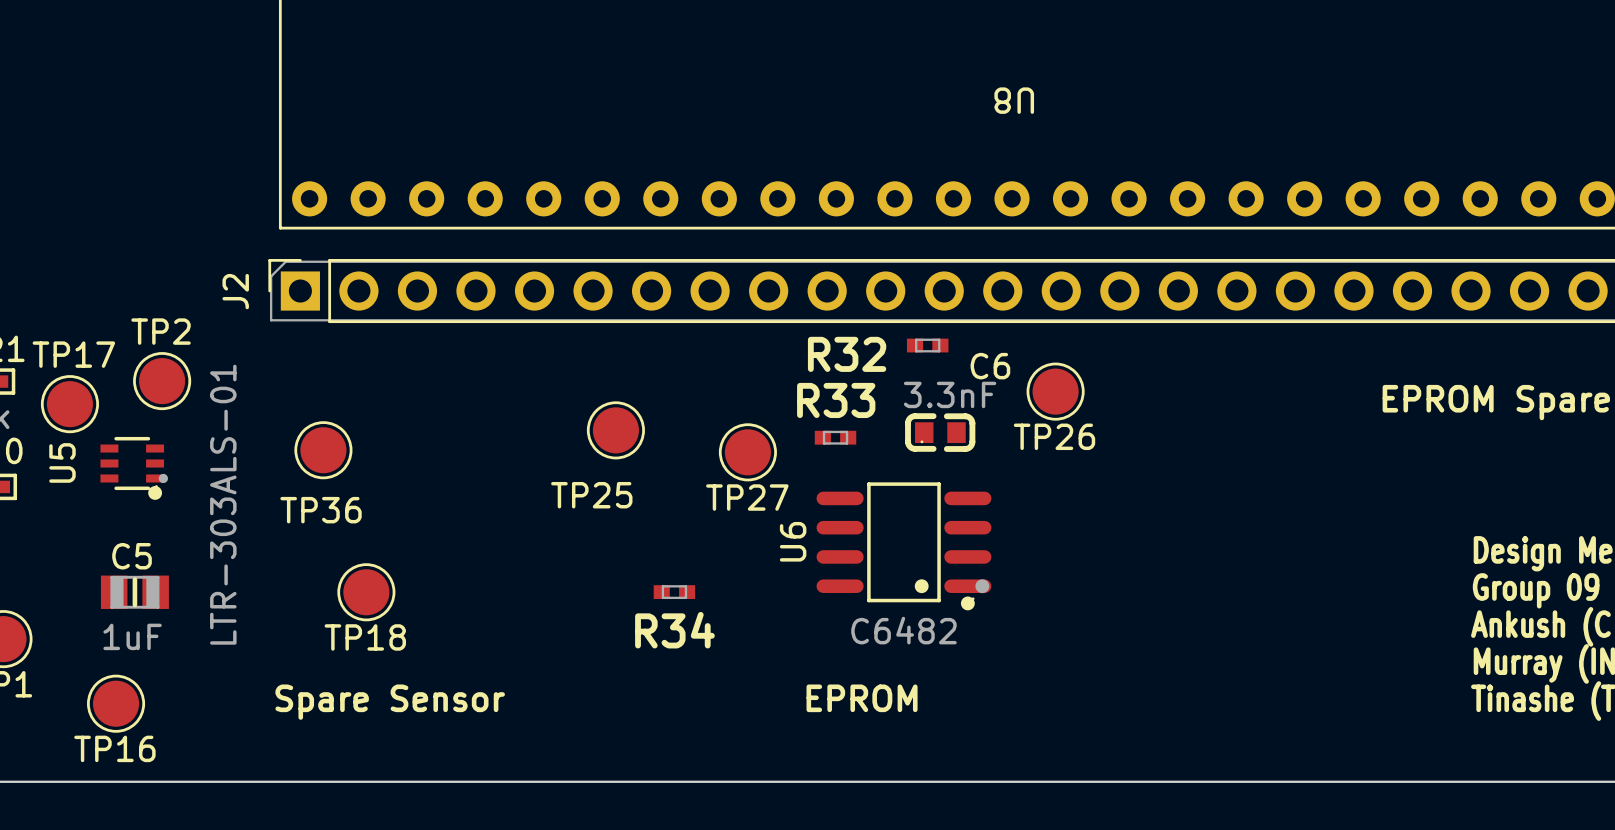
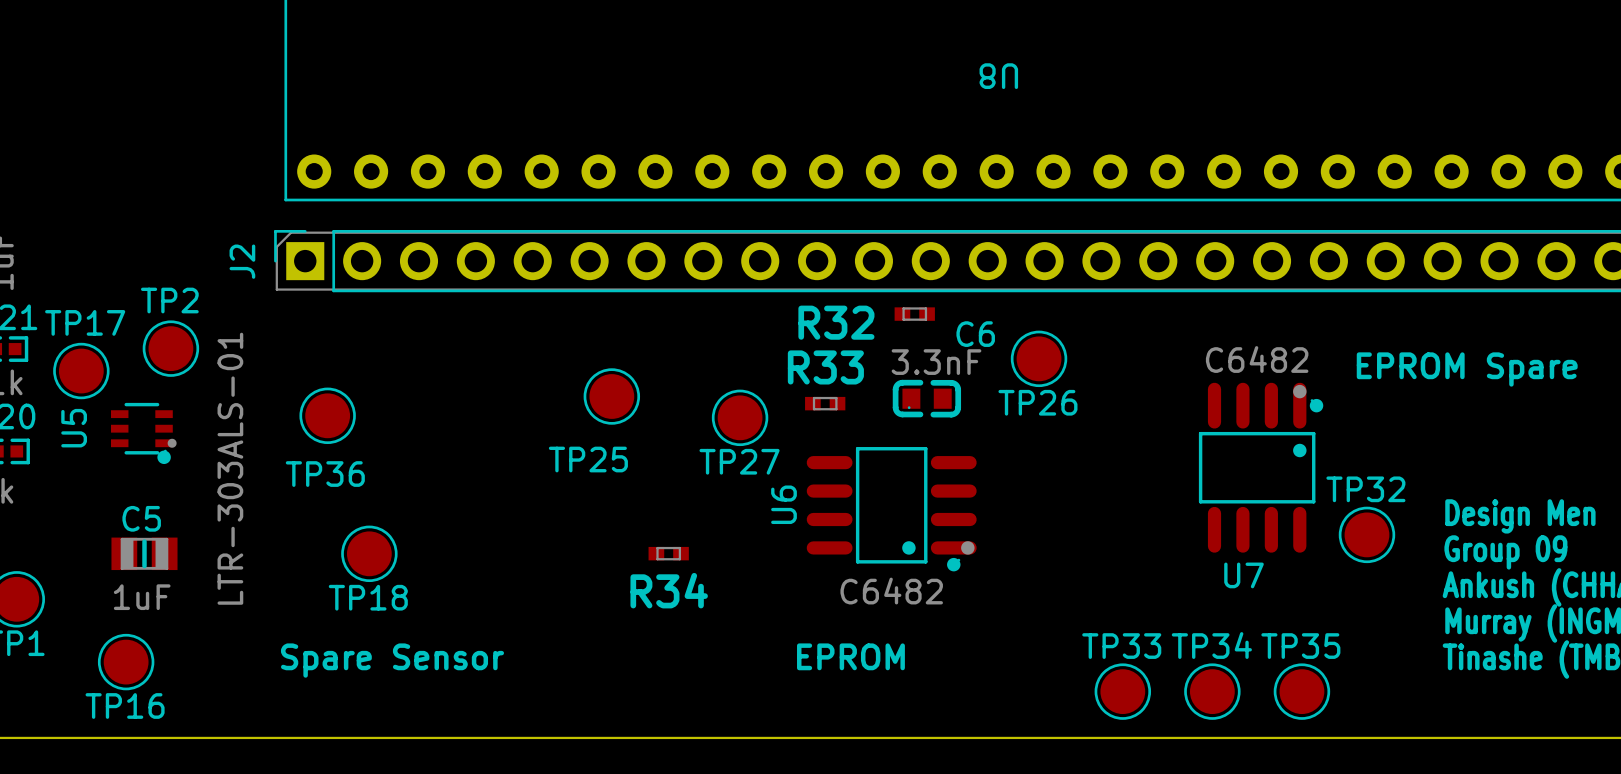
U7: none -> C6482 (1261, 467)
TP32: none -> (1366, 534)
TP33: none -> (1122, 691)
TP34: none -> (1212, 691)
TP35: none -> (1301, 691)

